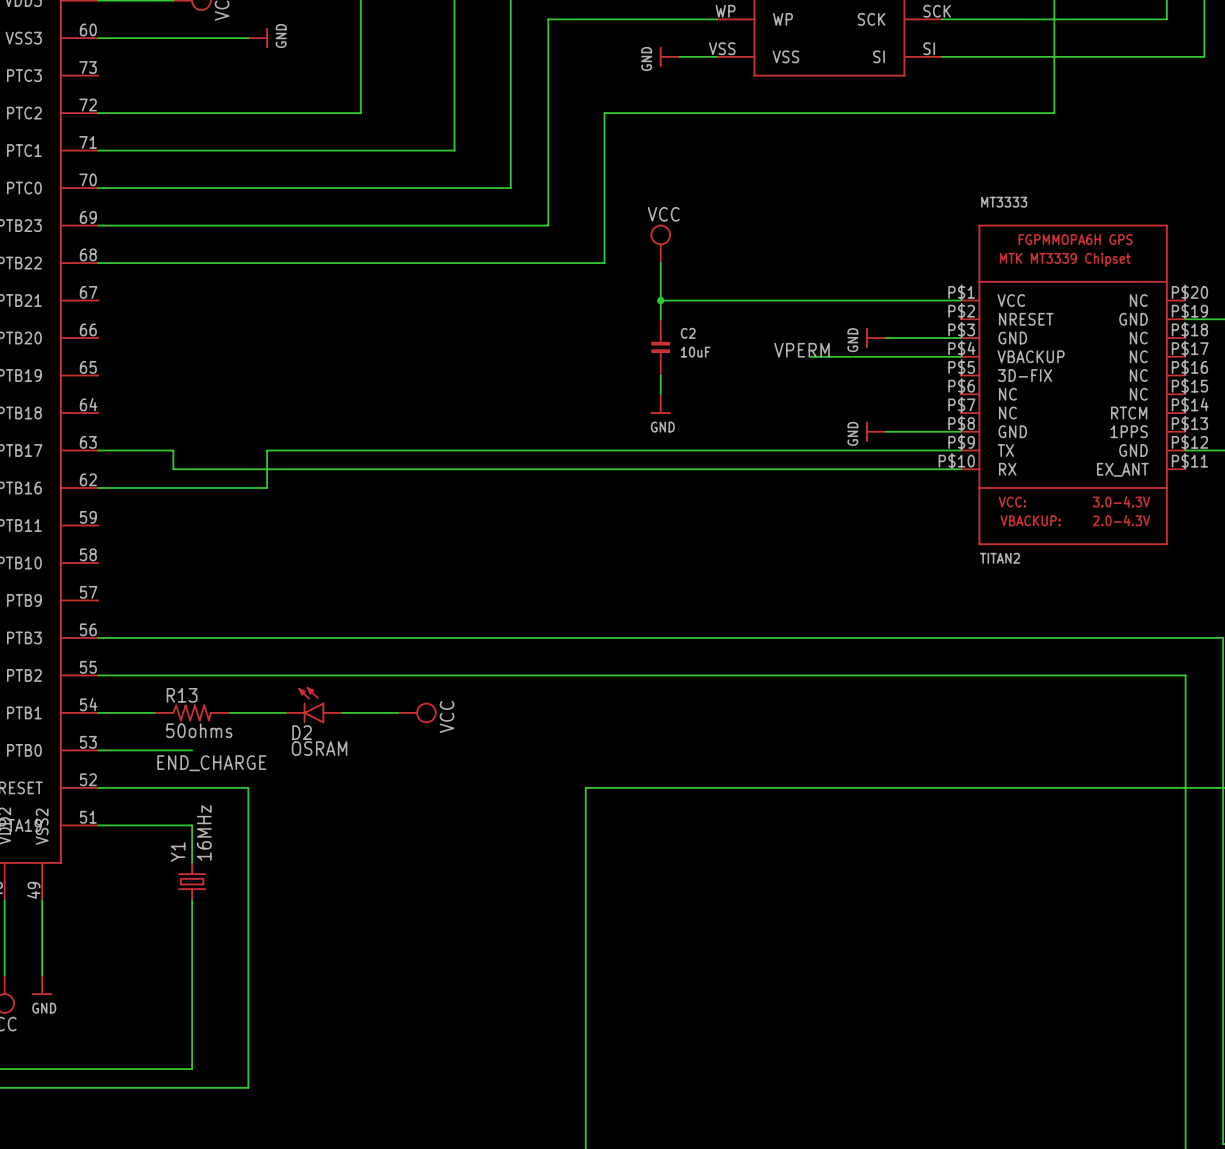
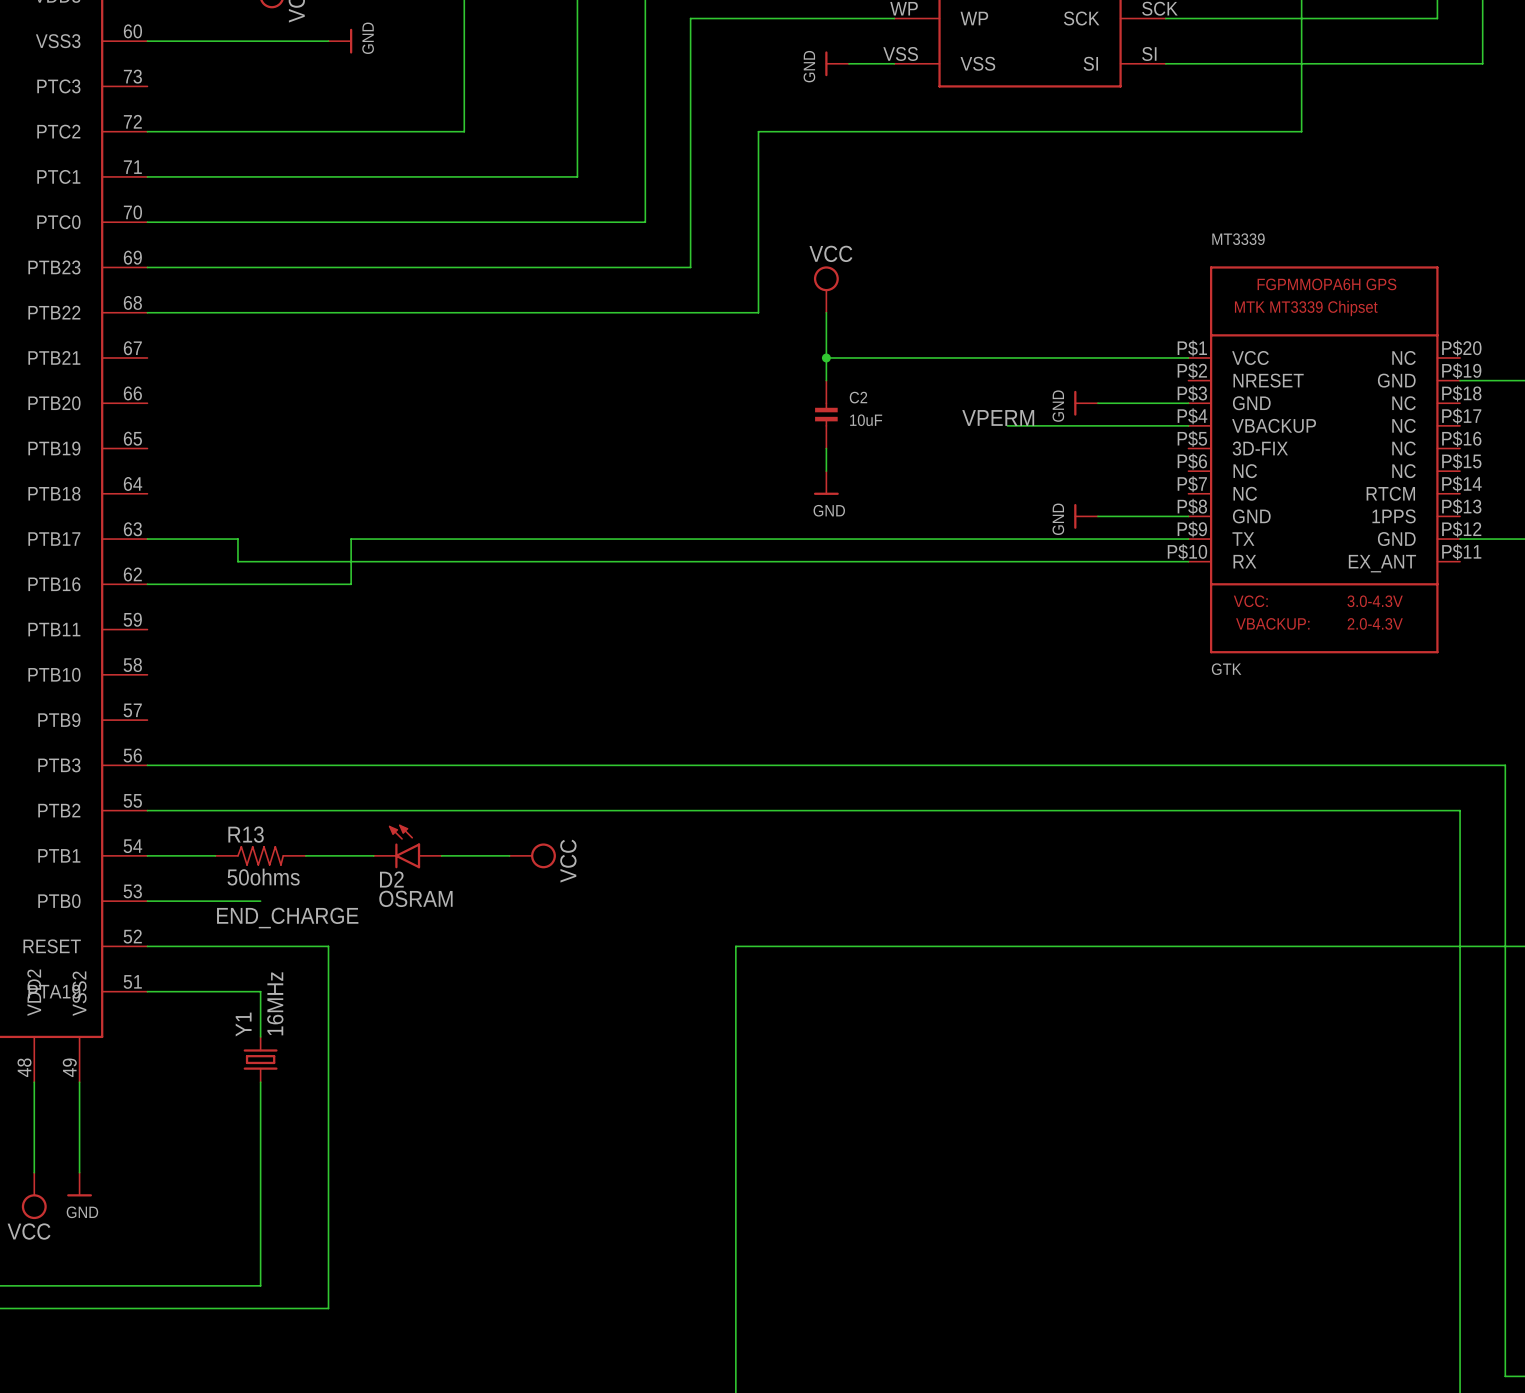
MT3333 name: MT3333 (1004, 202) -> MT3339 (1238, 239)
MT3333 value: TITAN2 (999, 558) -> GTK (1226, 669)

